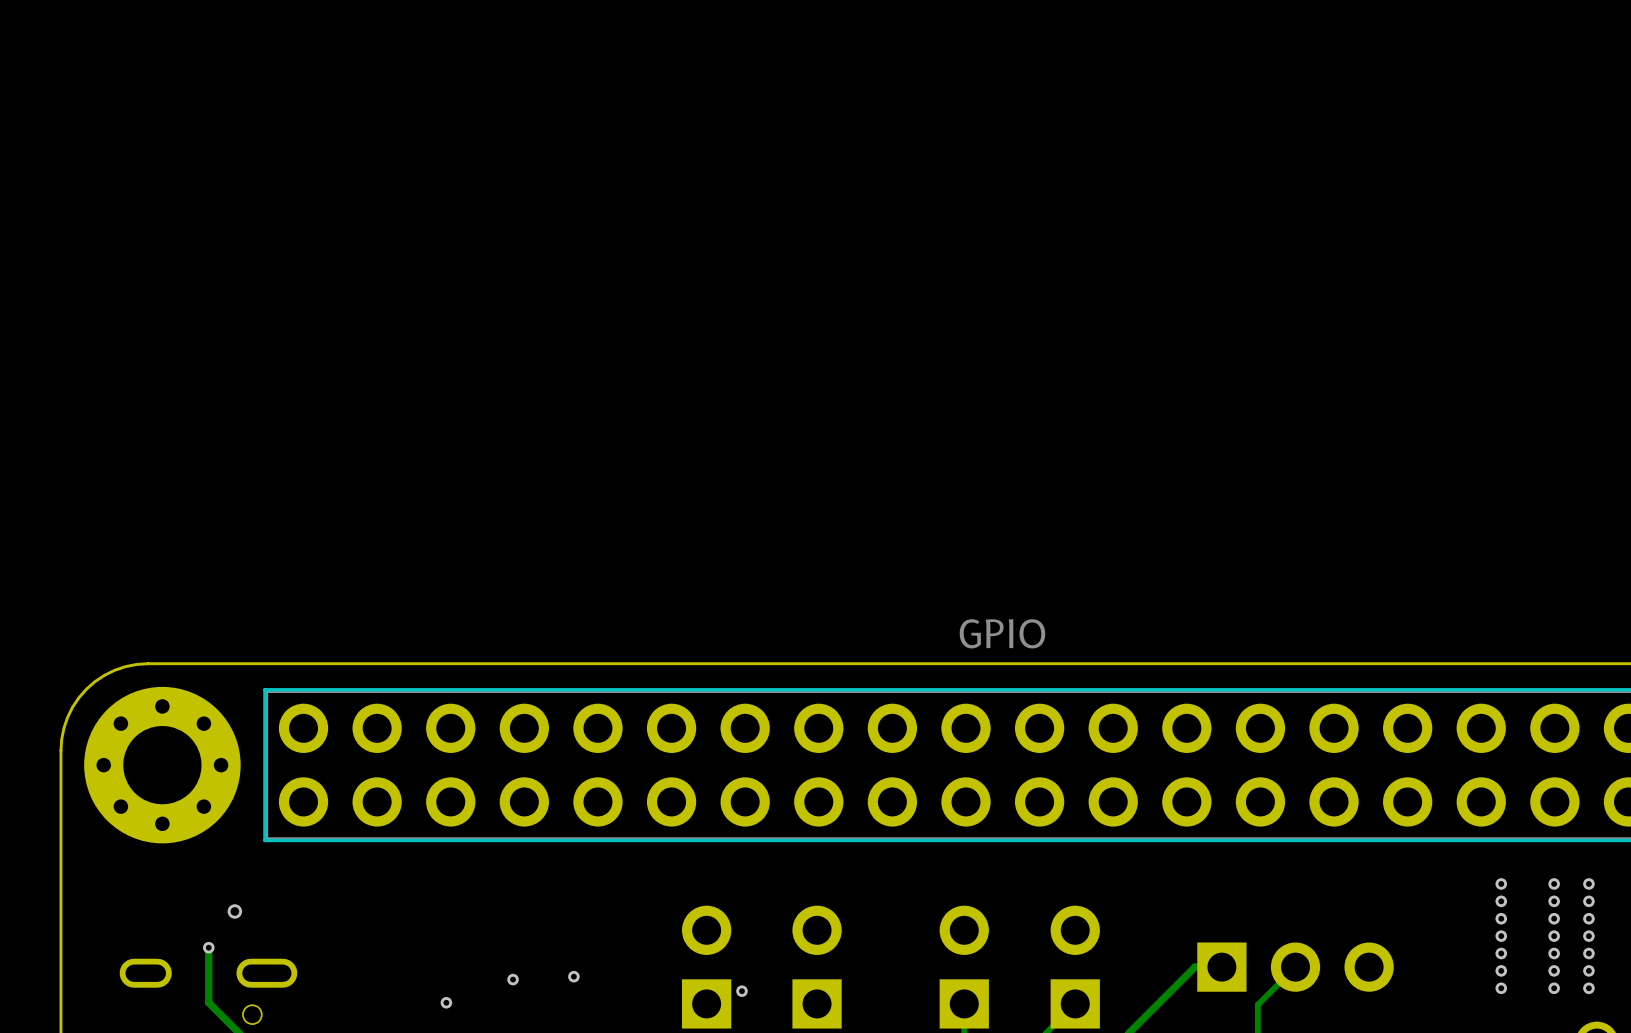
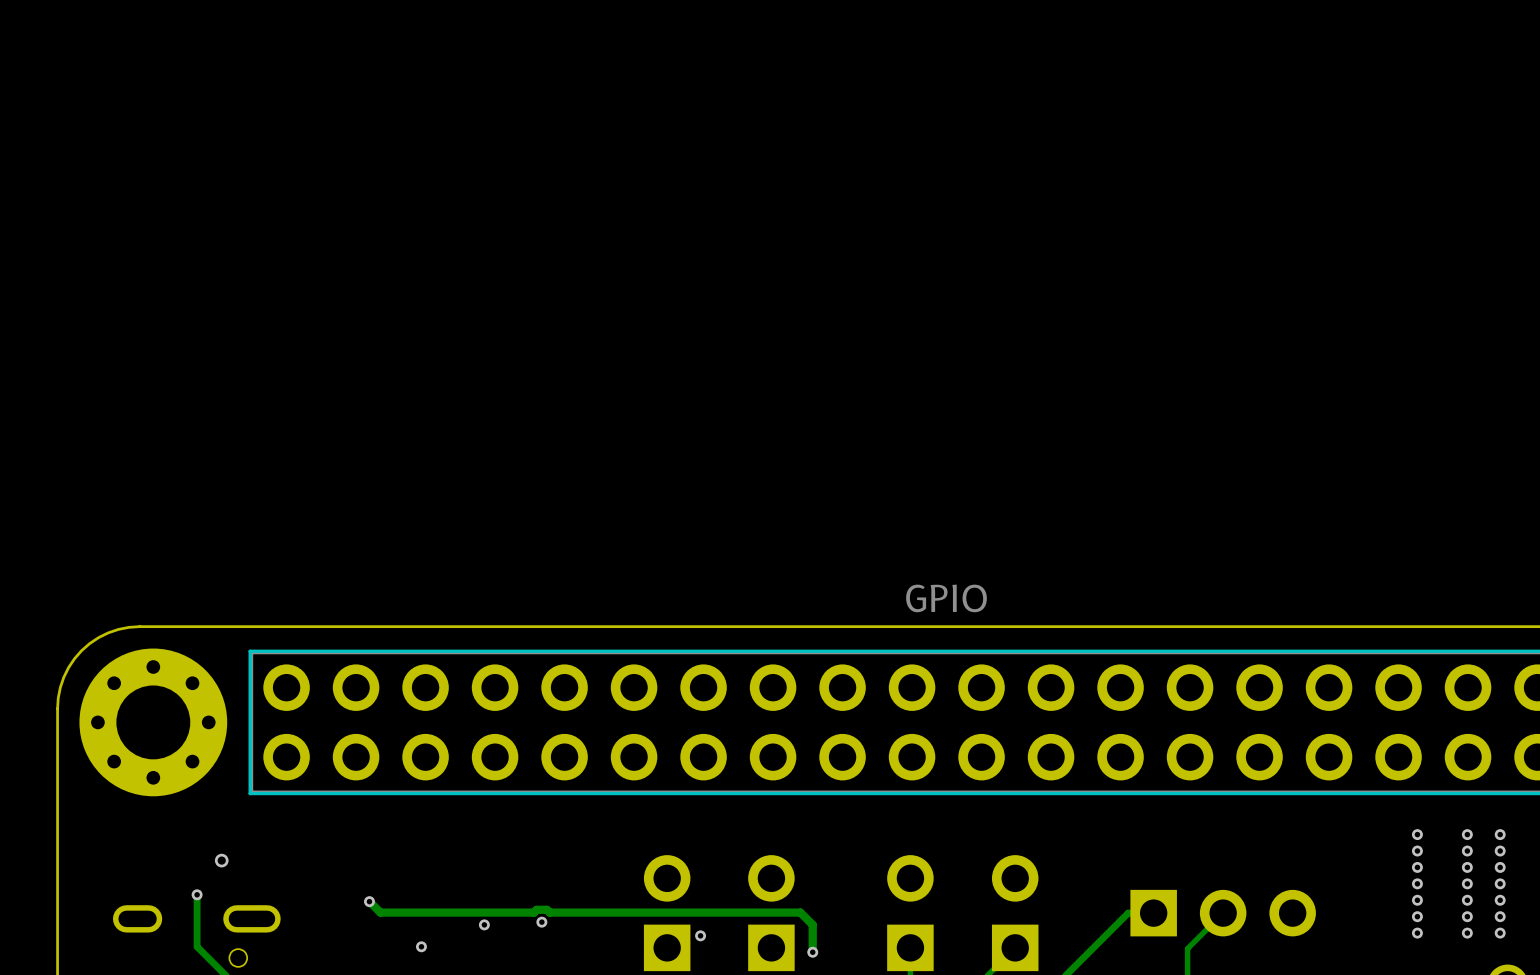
track: none -> (369, 901) (380, 912) (533, 912) (536, 909) (546, 909) (549, 912) (800, 912) (812, 924) (812, 952)
via: none -> (369, 901)
via: none -> (812, 952)

